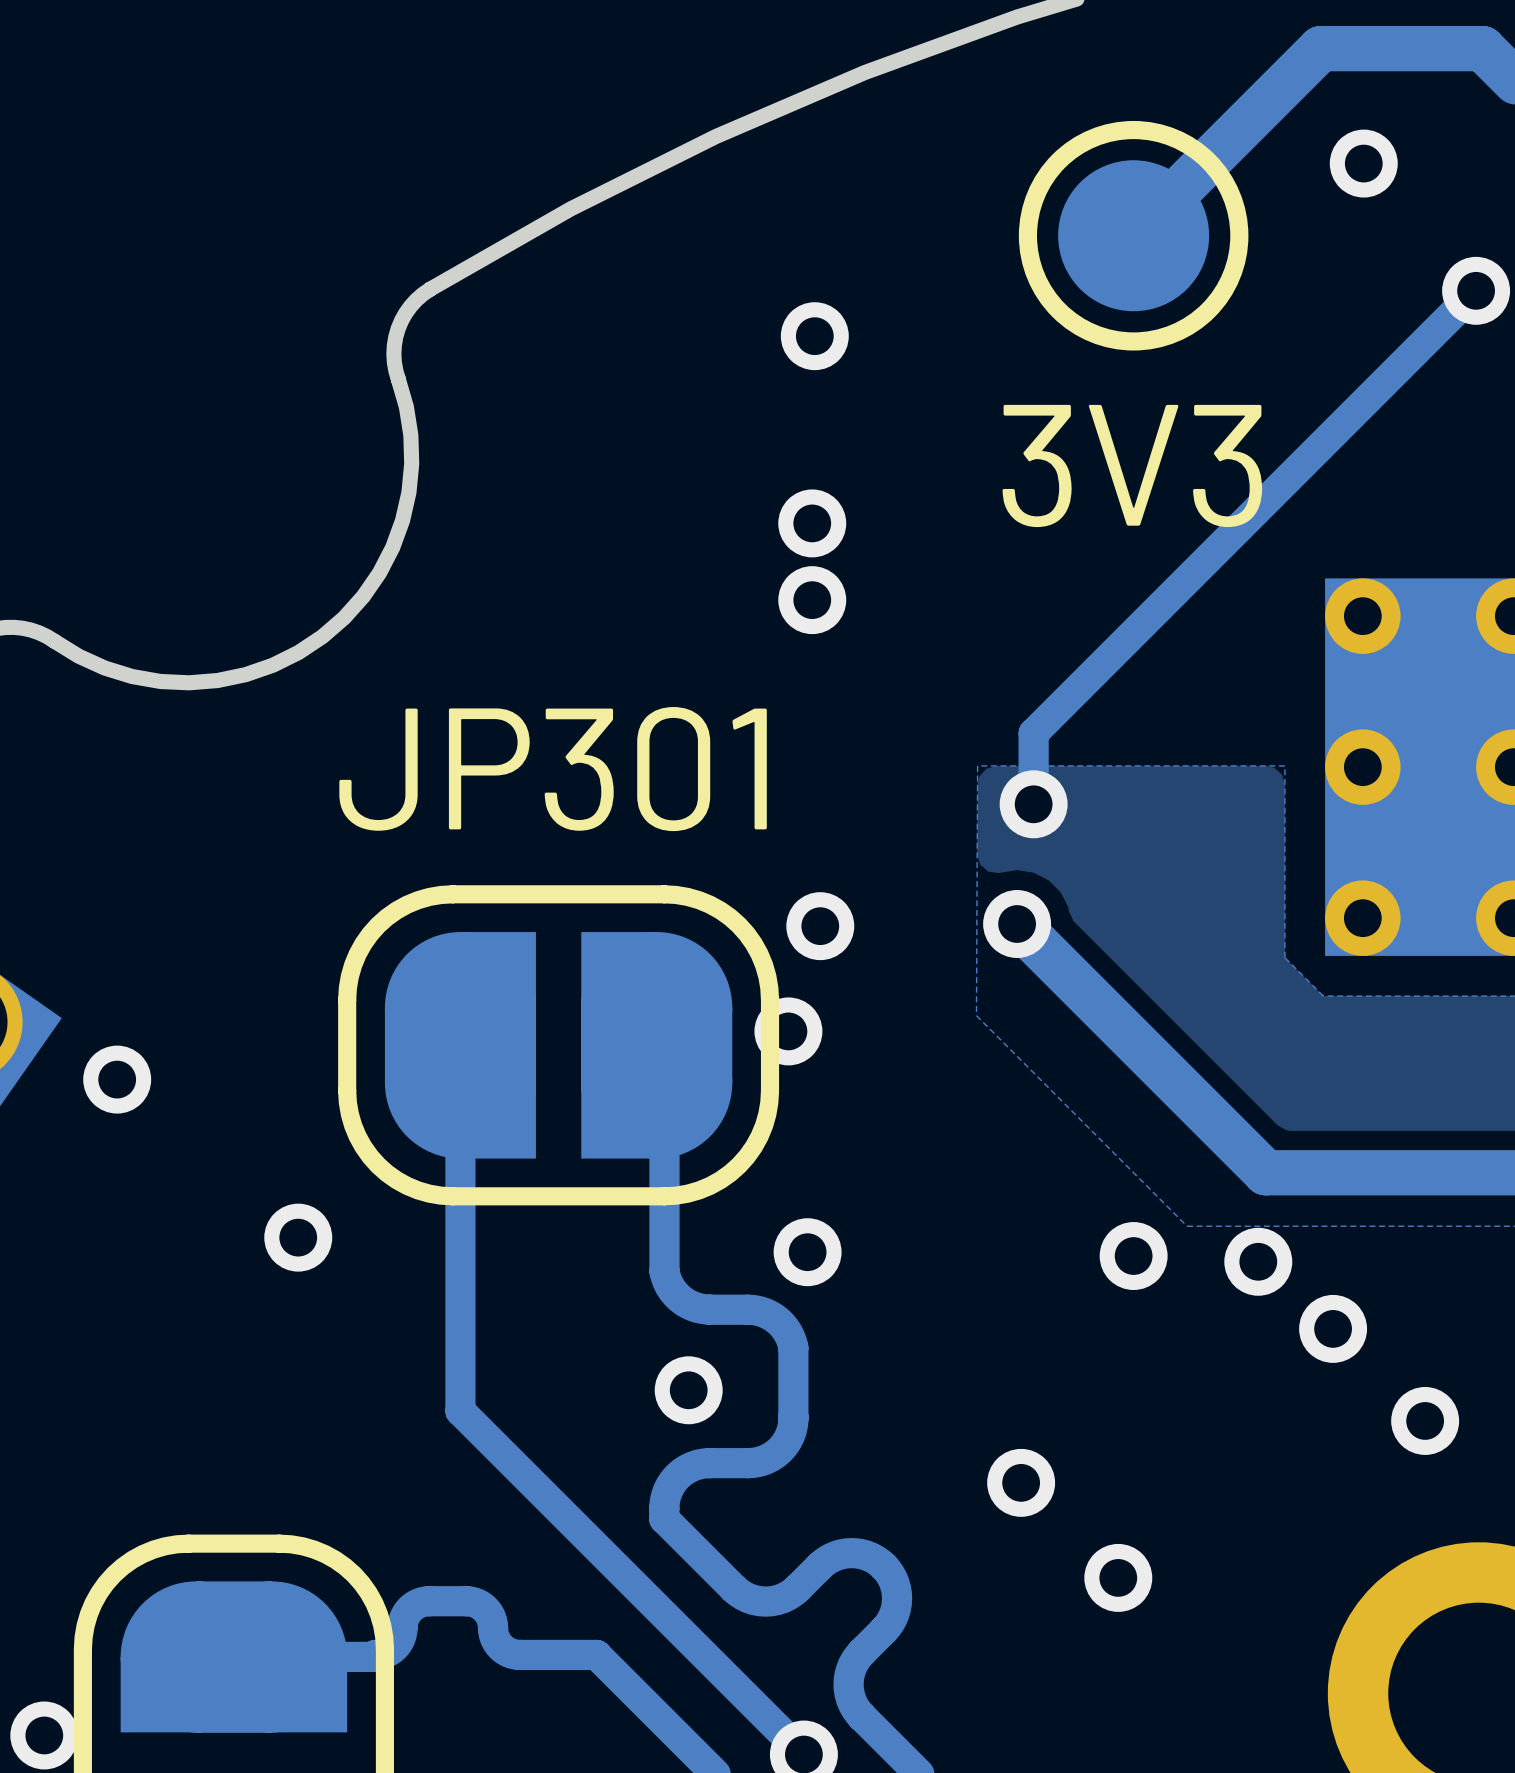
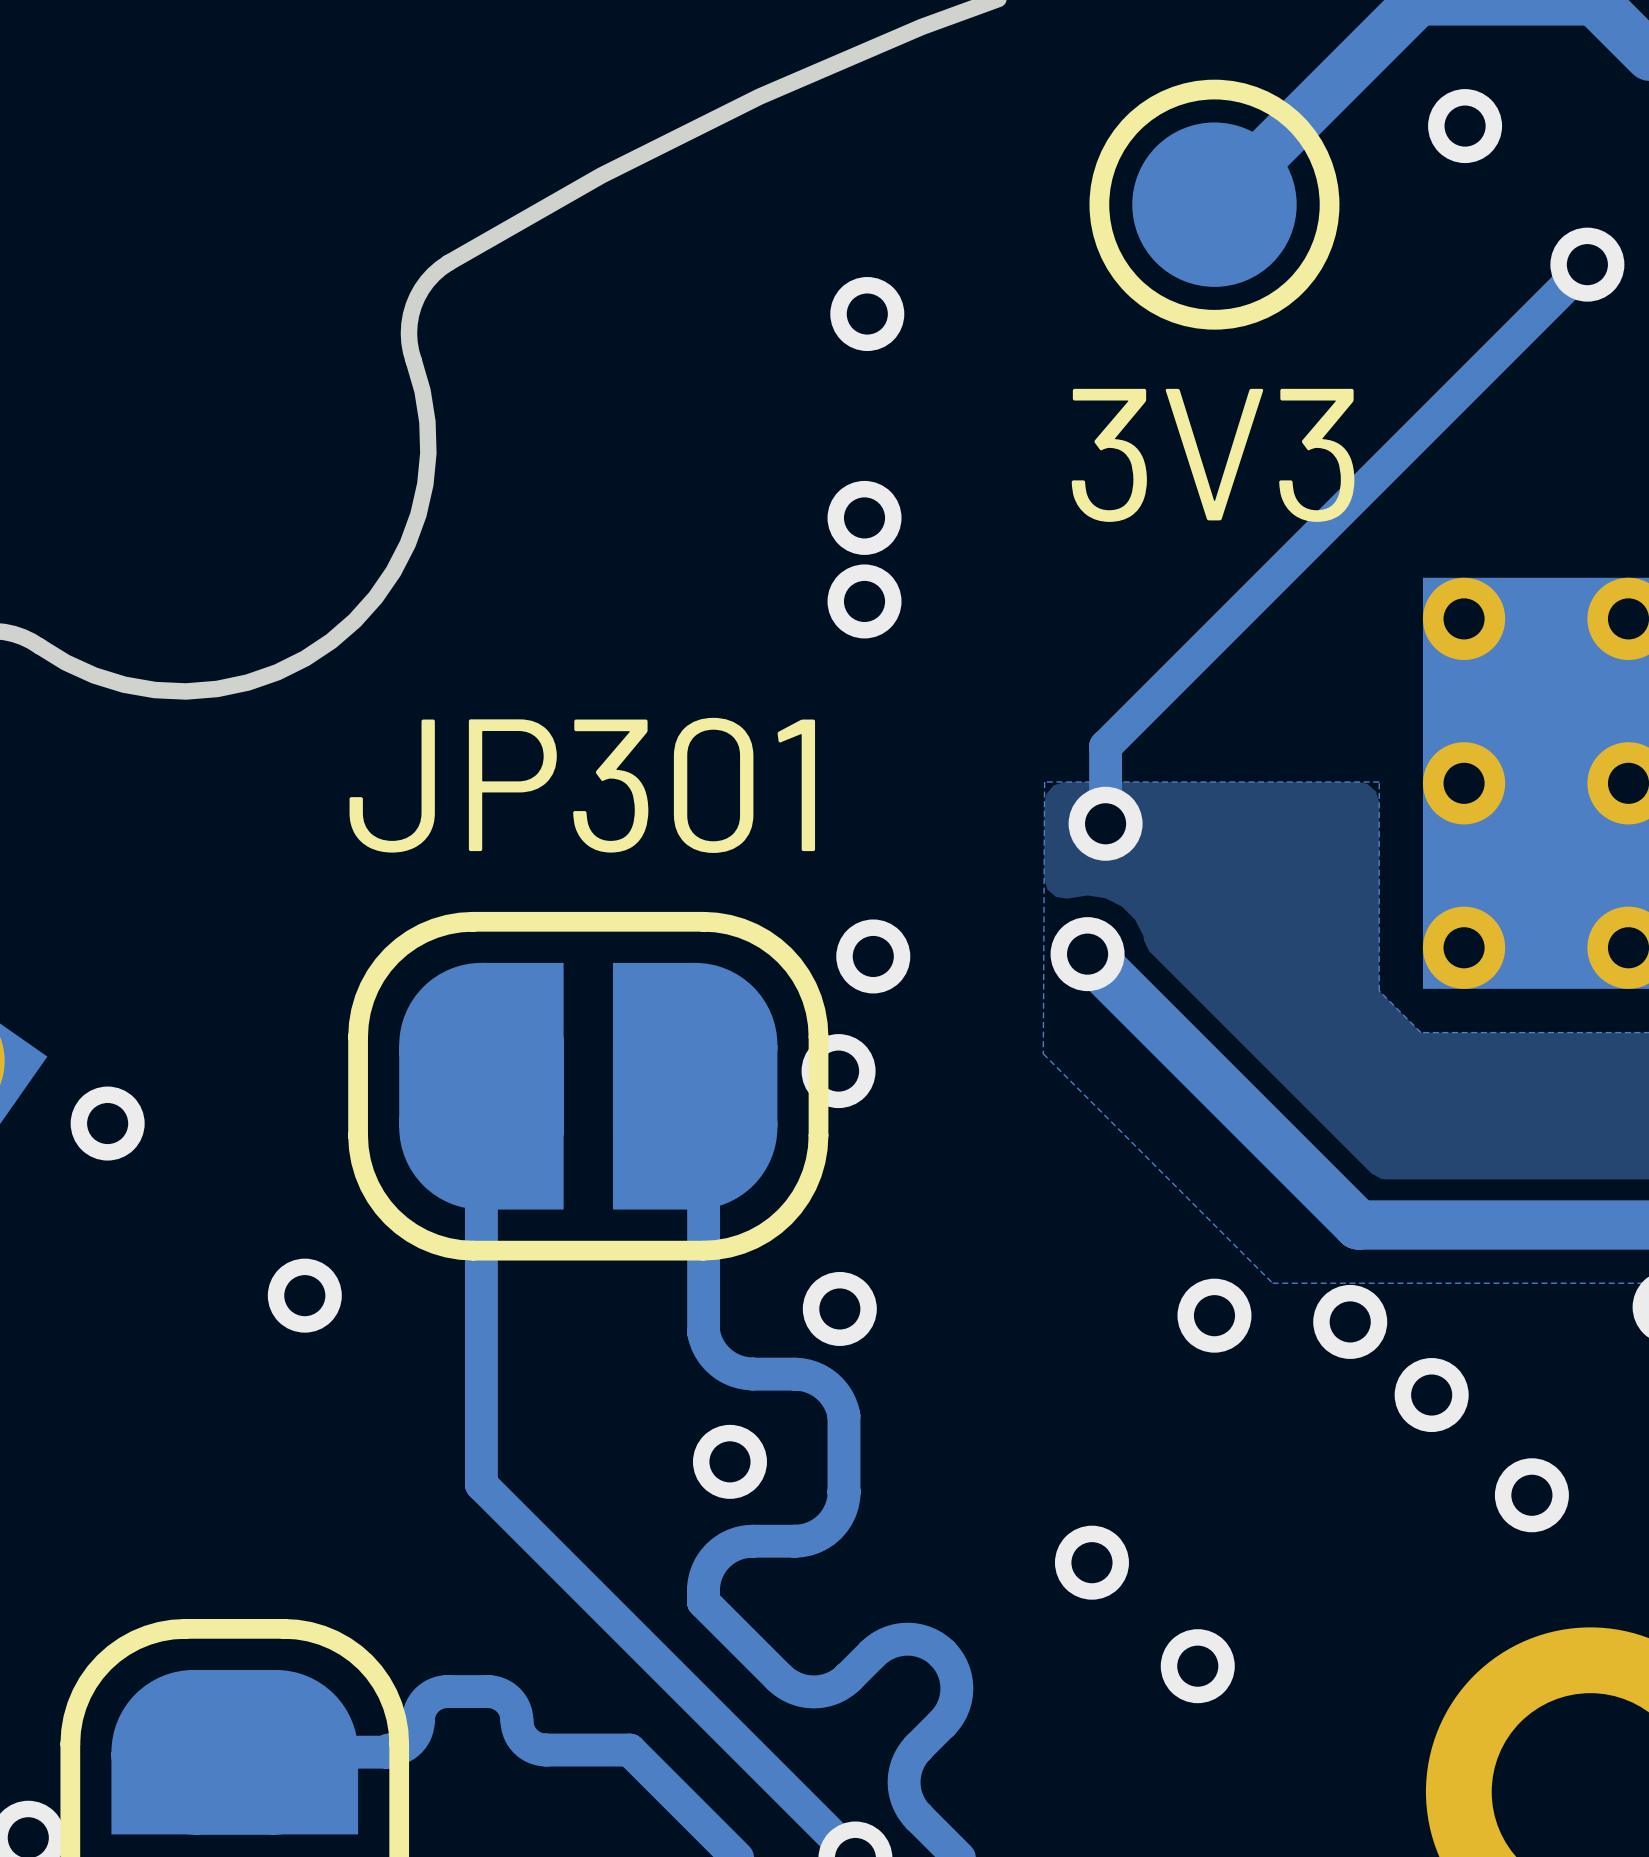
via position: (807, 1252) -> (839, 1308)

